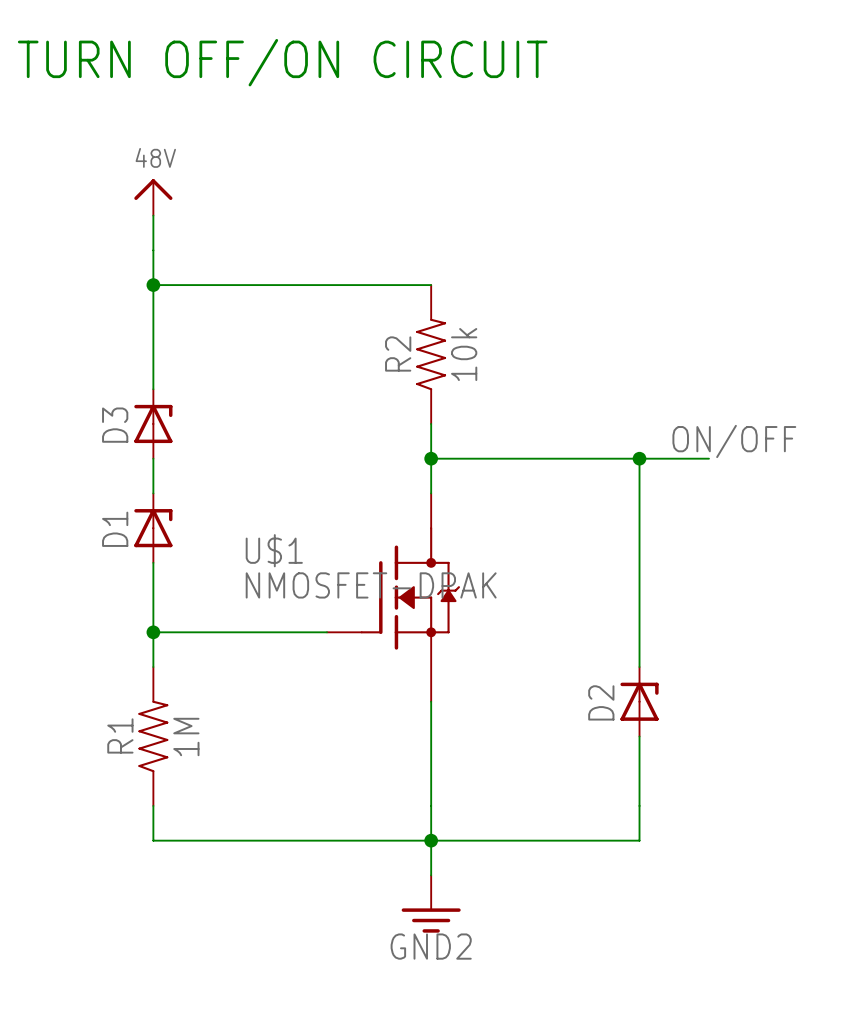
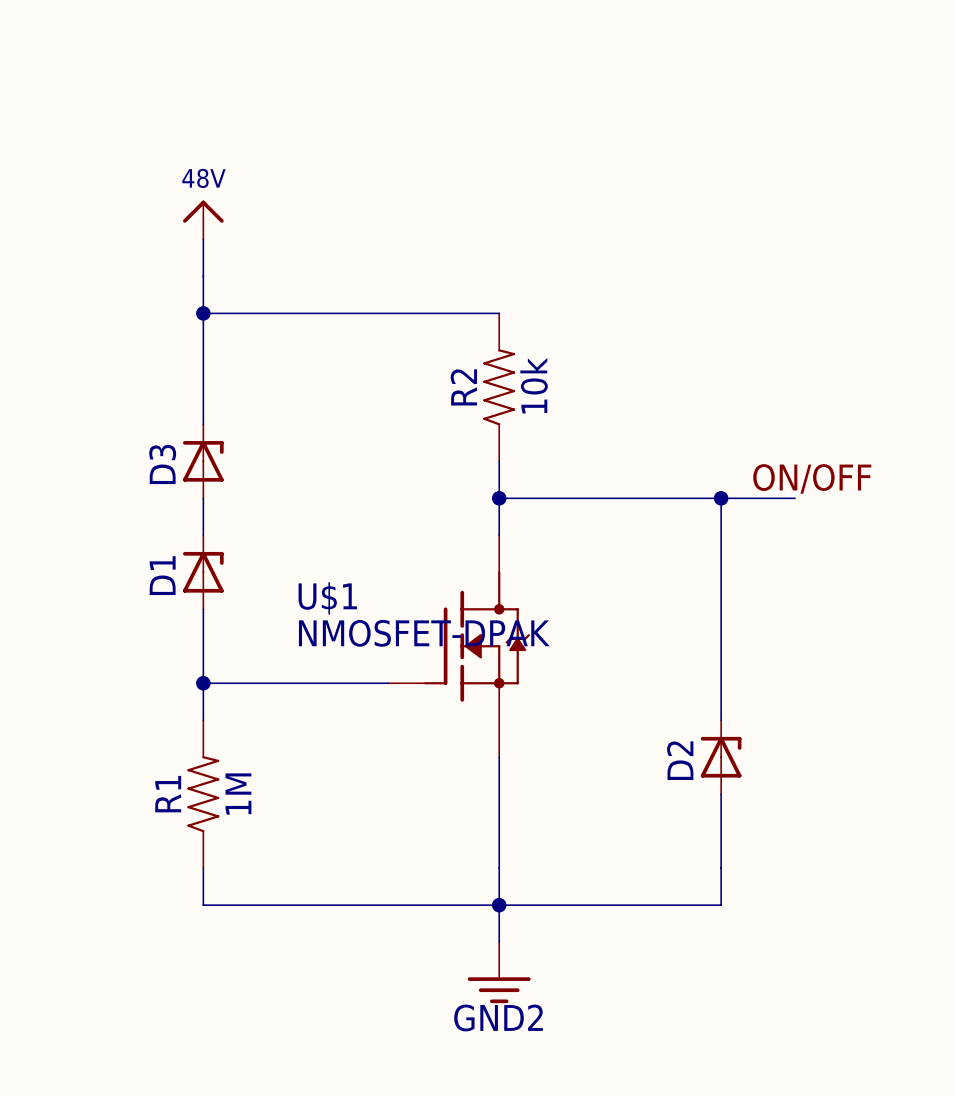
text: TURN OFF/ON CIRCUIT (282, 62) -> none

